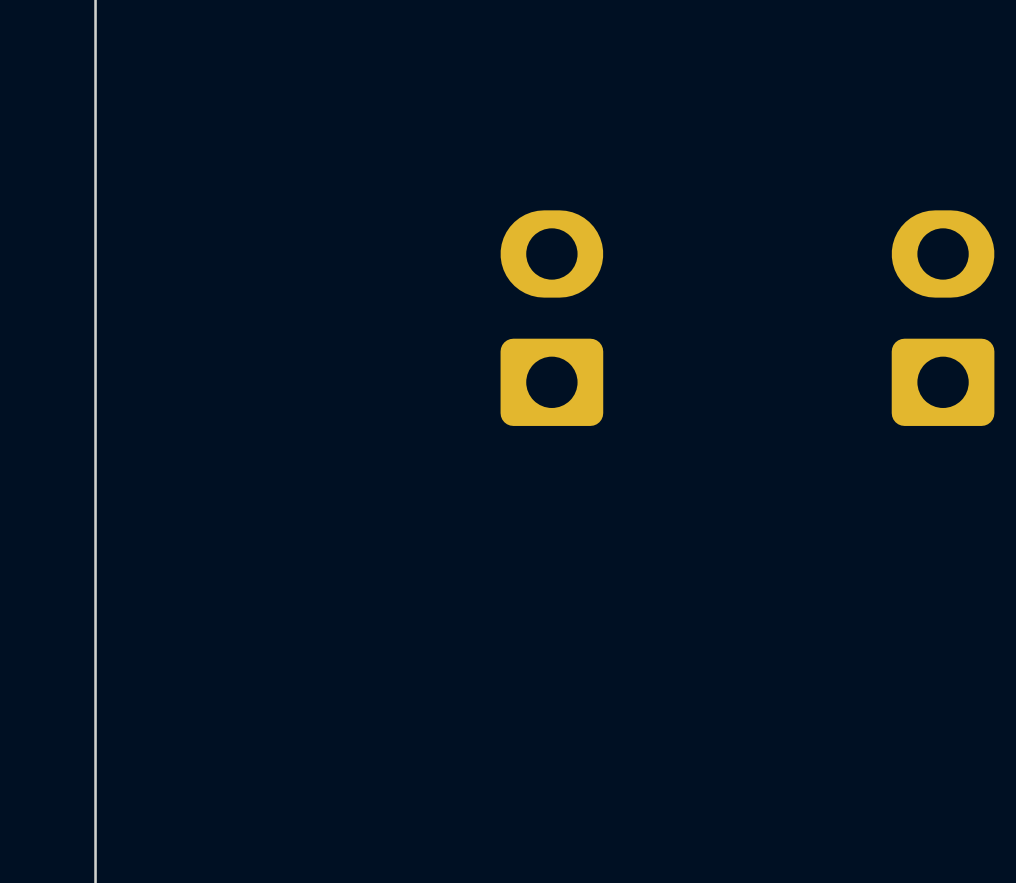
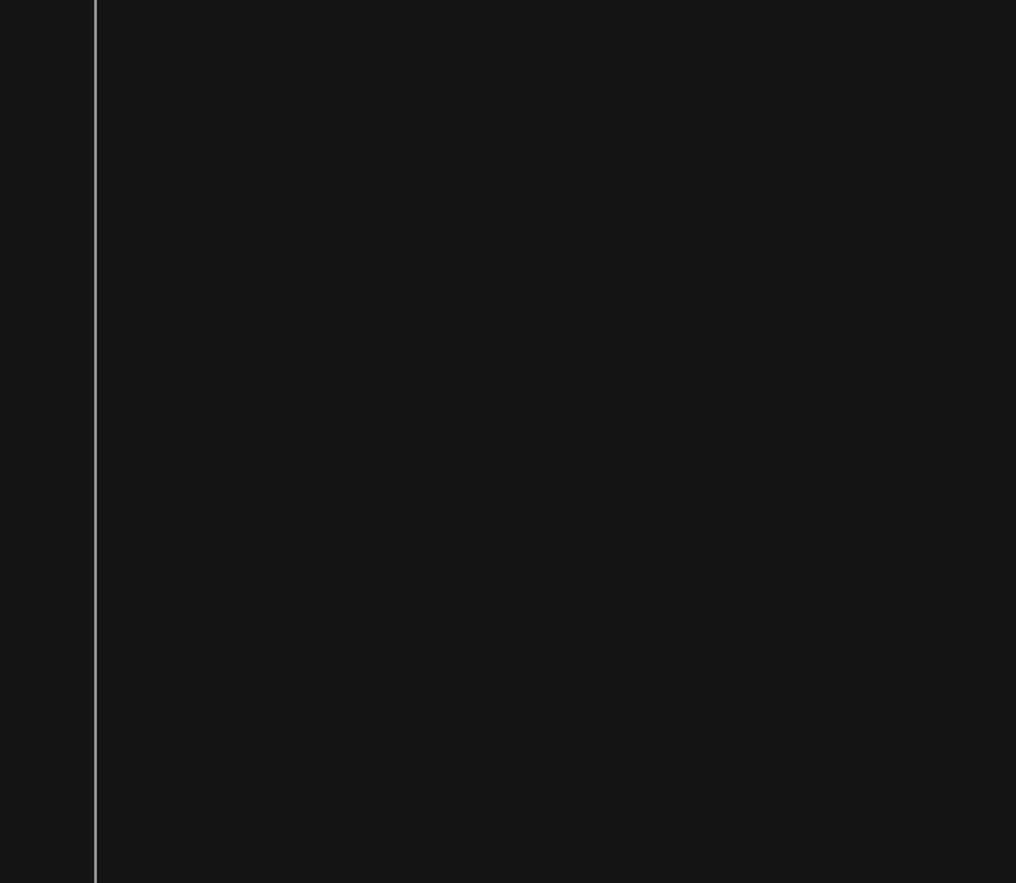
part: (551, 318) -> none
part: (943, 318) -> none

